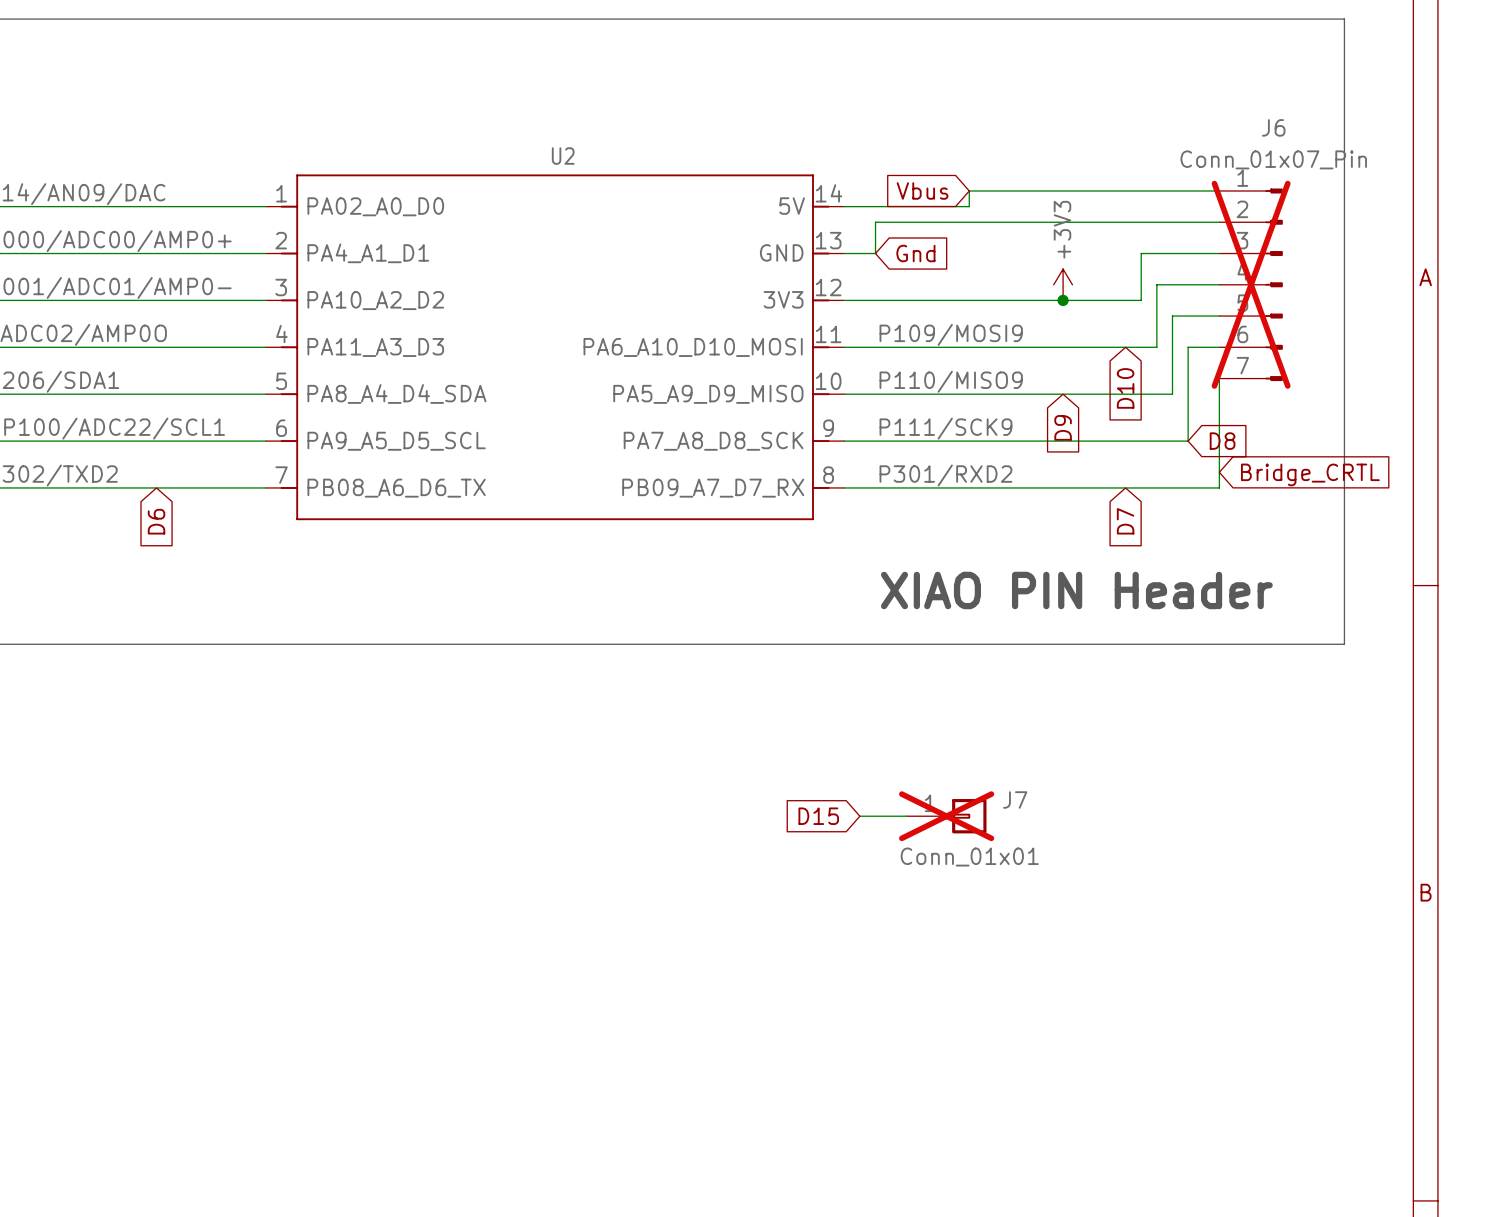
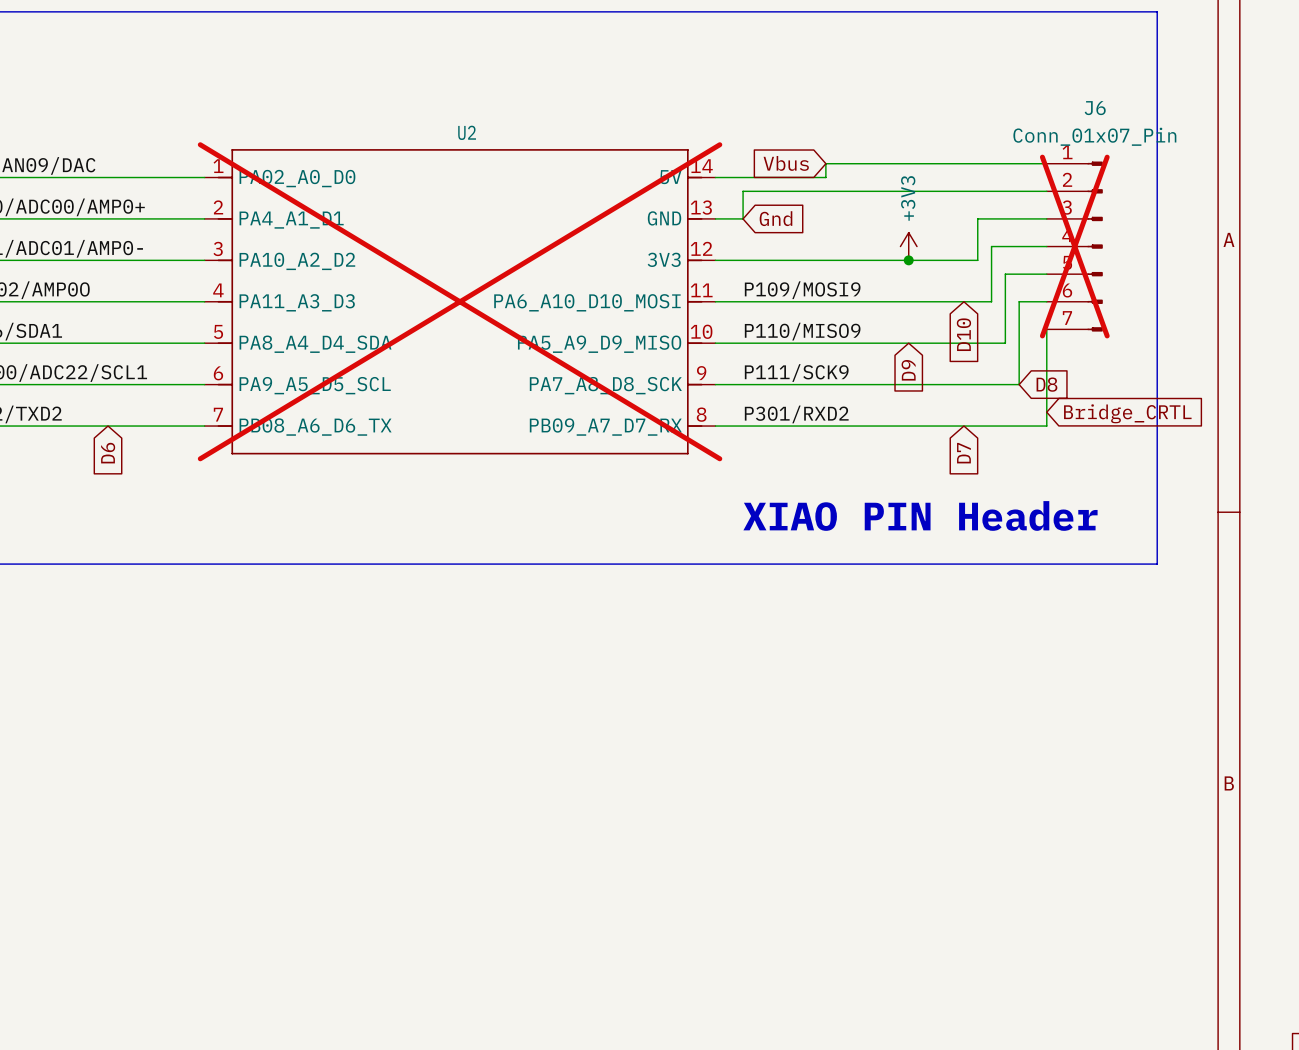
U2 do-not-place cross: none -> (460, 301)
global label: D15 (818, 816) -> none
wire: (859, 816) (906, 816) -> none
J7: Conn_01x01 (946, 816) -> none

